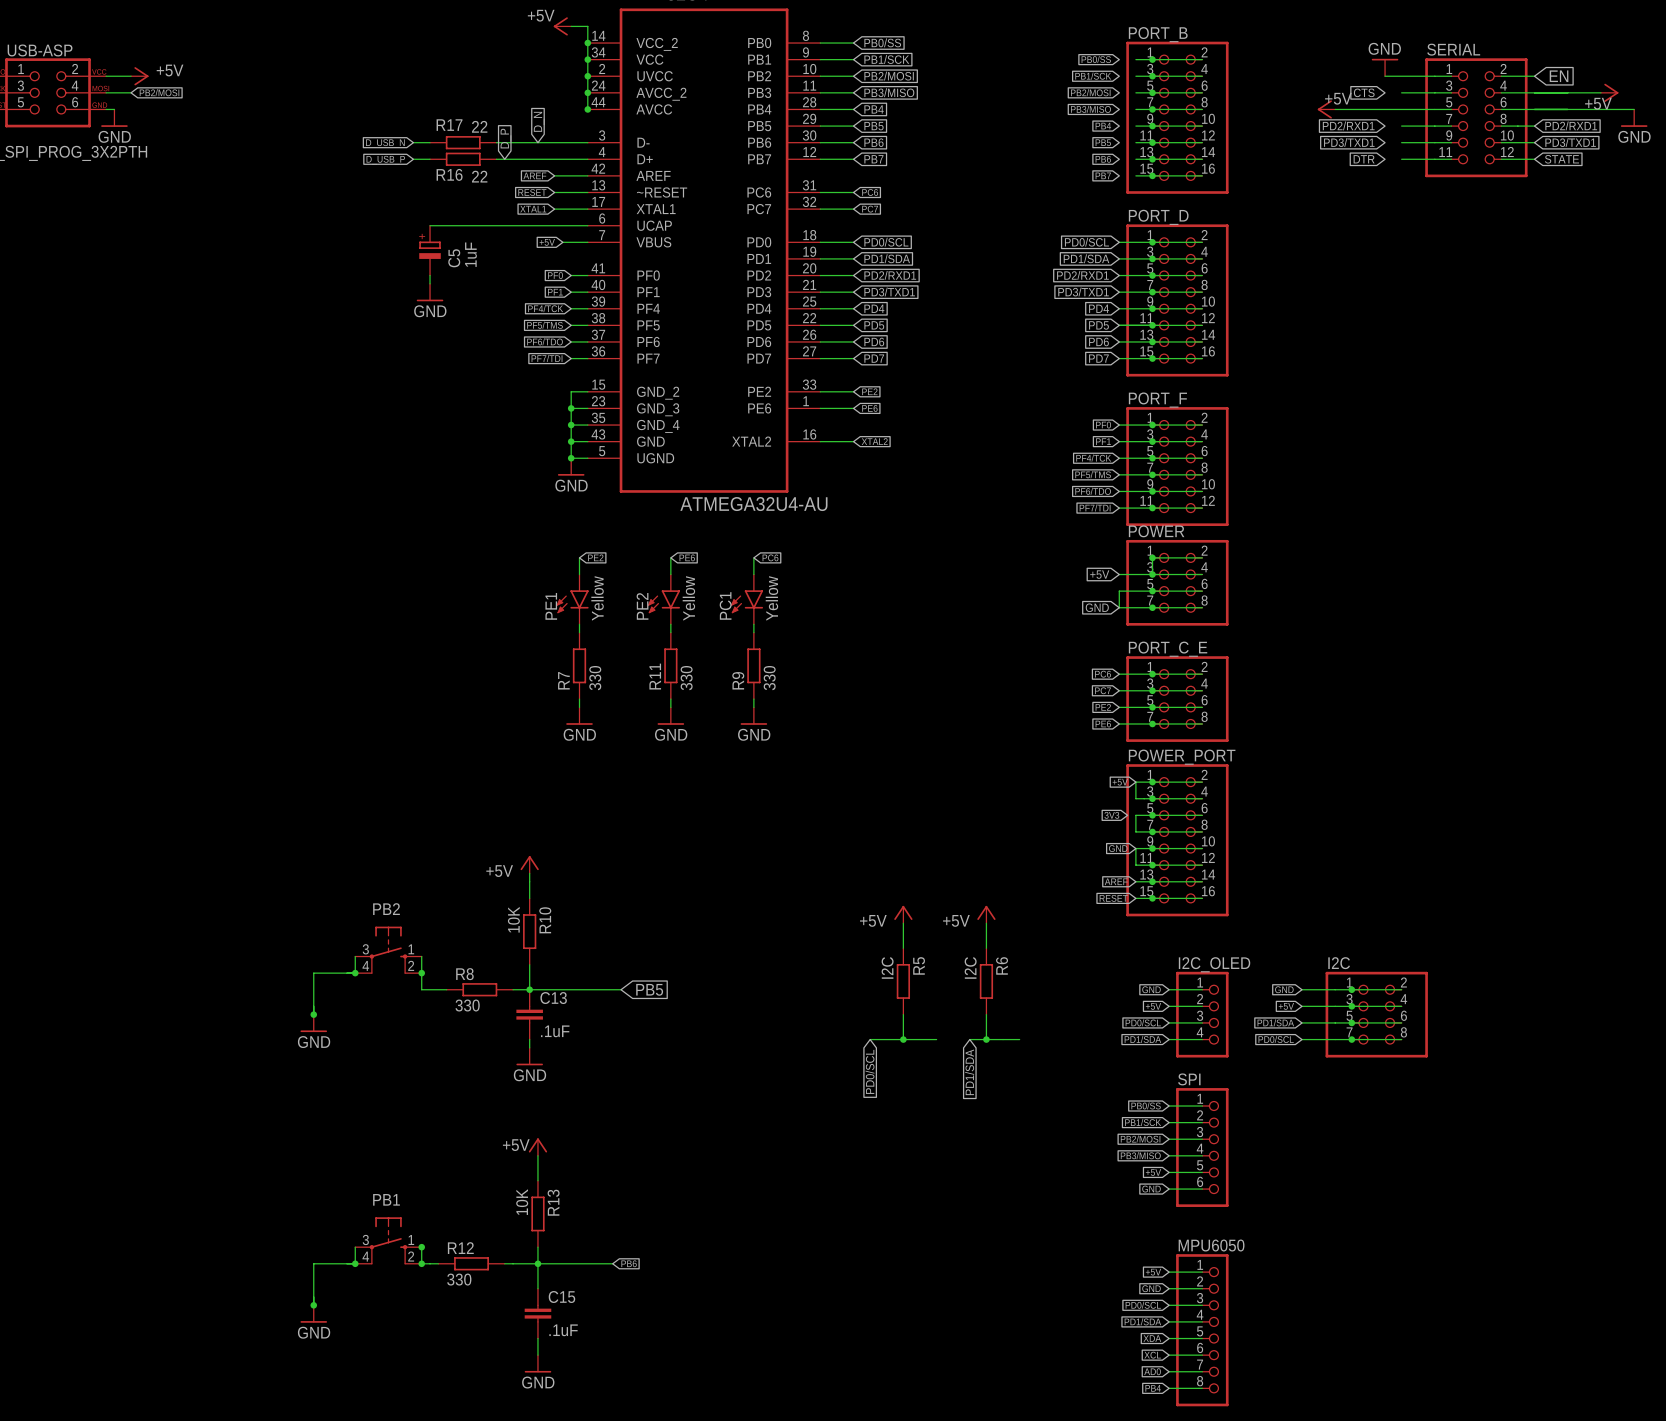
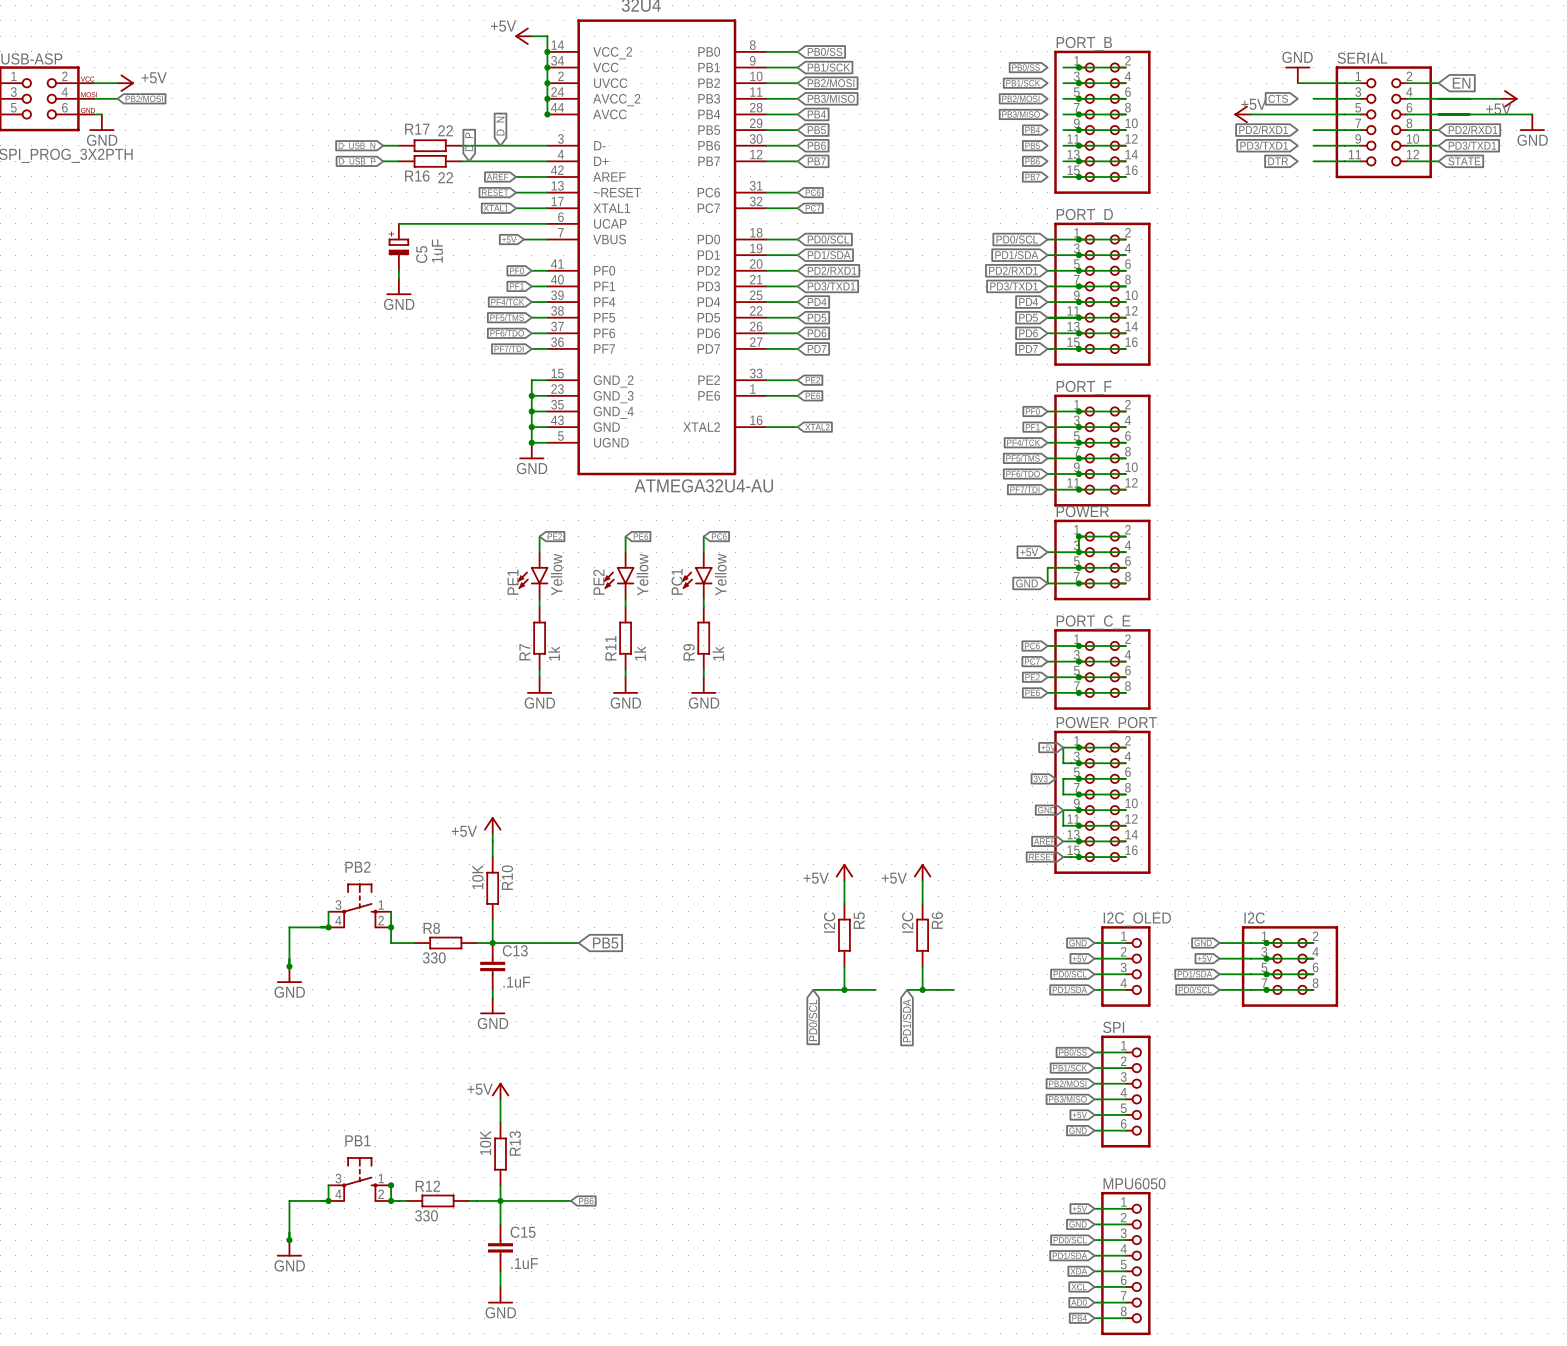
R7 value: 330 (595, 678) -> 1k (554, 653)
R11 value: 330 (686, 678) -> 1k (640, 653)
R9 value: 330 (769, 678) -> 1k (718, 653)

